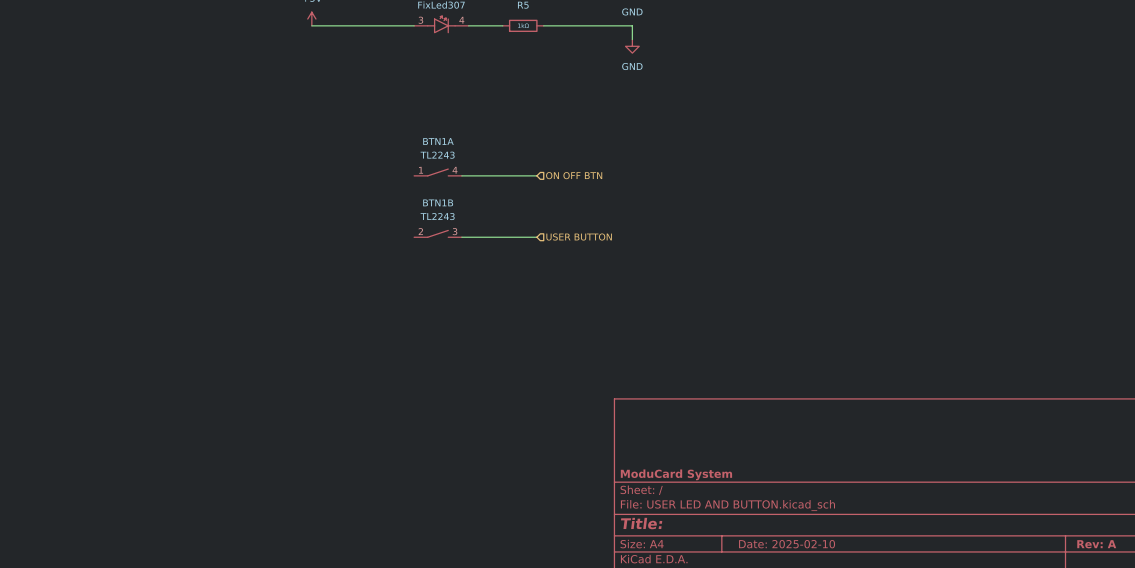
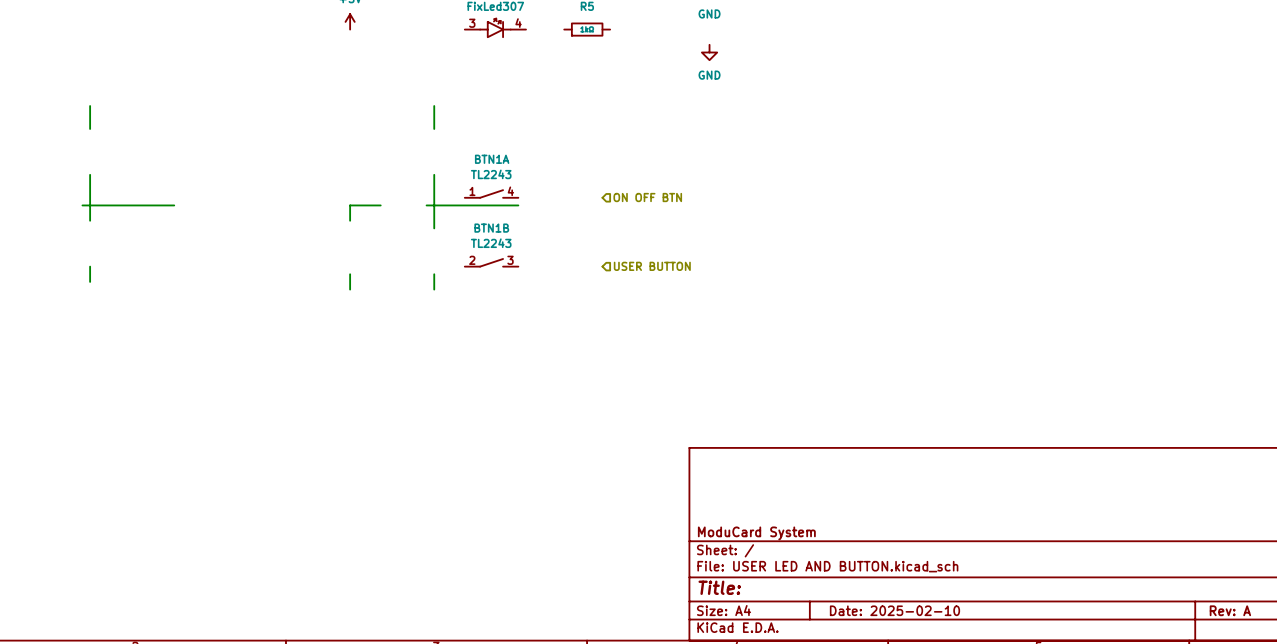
wire: (311, 25) (414, 25) -> none
wire: (468, 25) (502, 25) -> none
wire: (543, 25) (632, 25) (632, 39) -> none
wire: none -> (90, 106) (90, 128)
wire: none -> (434, 106) (434, 128)
wire: none -> (90, 174) (90, 220)
wire: none -> (434, 174) (434, 228)
wire: (461, 175) (536, 175) -> none
wire: none -> (82, 205) (174, 205)
wire: none -> (380, 205) (350, 205) (350, 220)
wire: none -> (426, 205) (518, 205)
wire: none -> (90, 266) (90, 281)
wire: (461, 237) (536, 237) -> none
wire: none -> (350, 274) (350, 289)
wire: none -> (434, 274) (434, 289)

